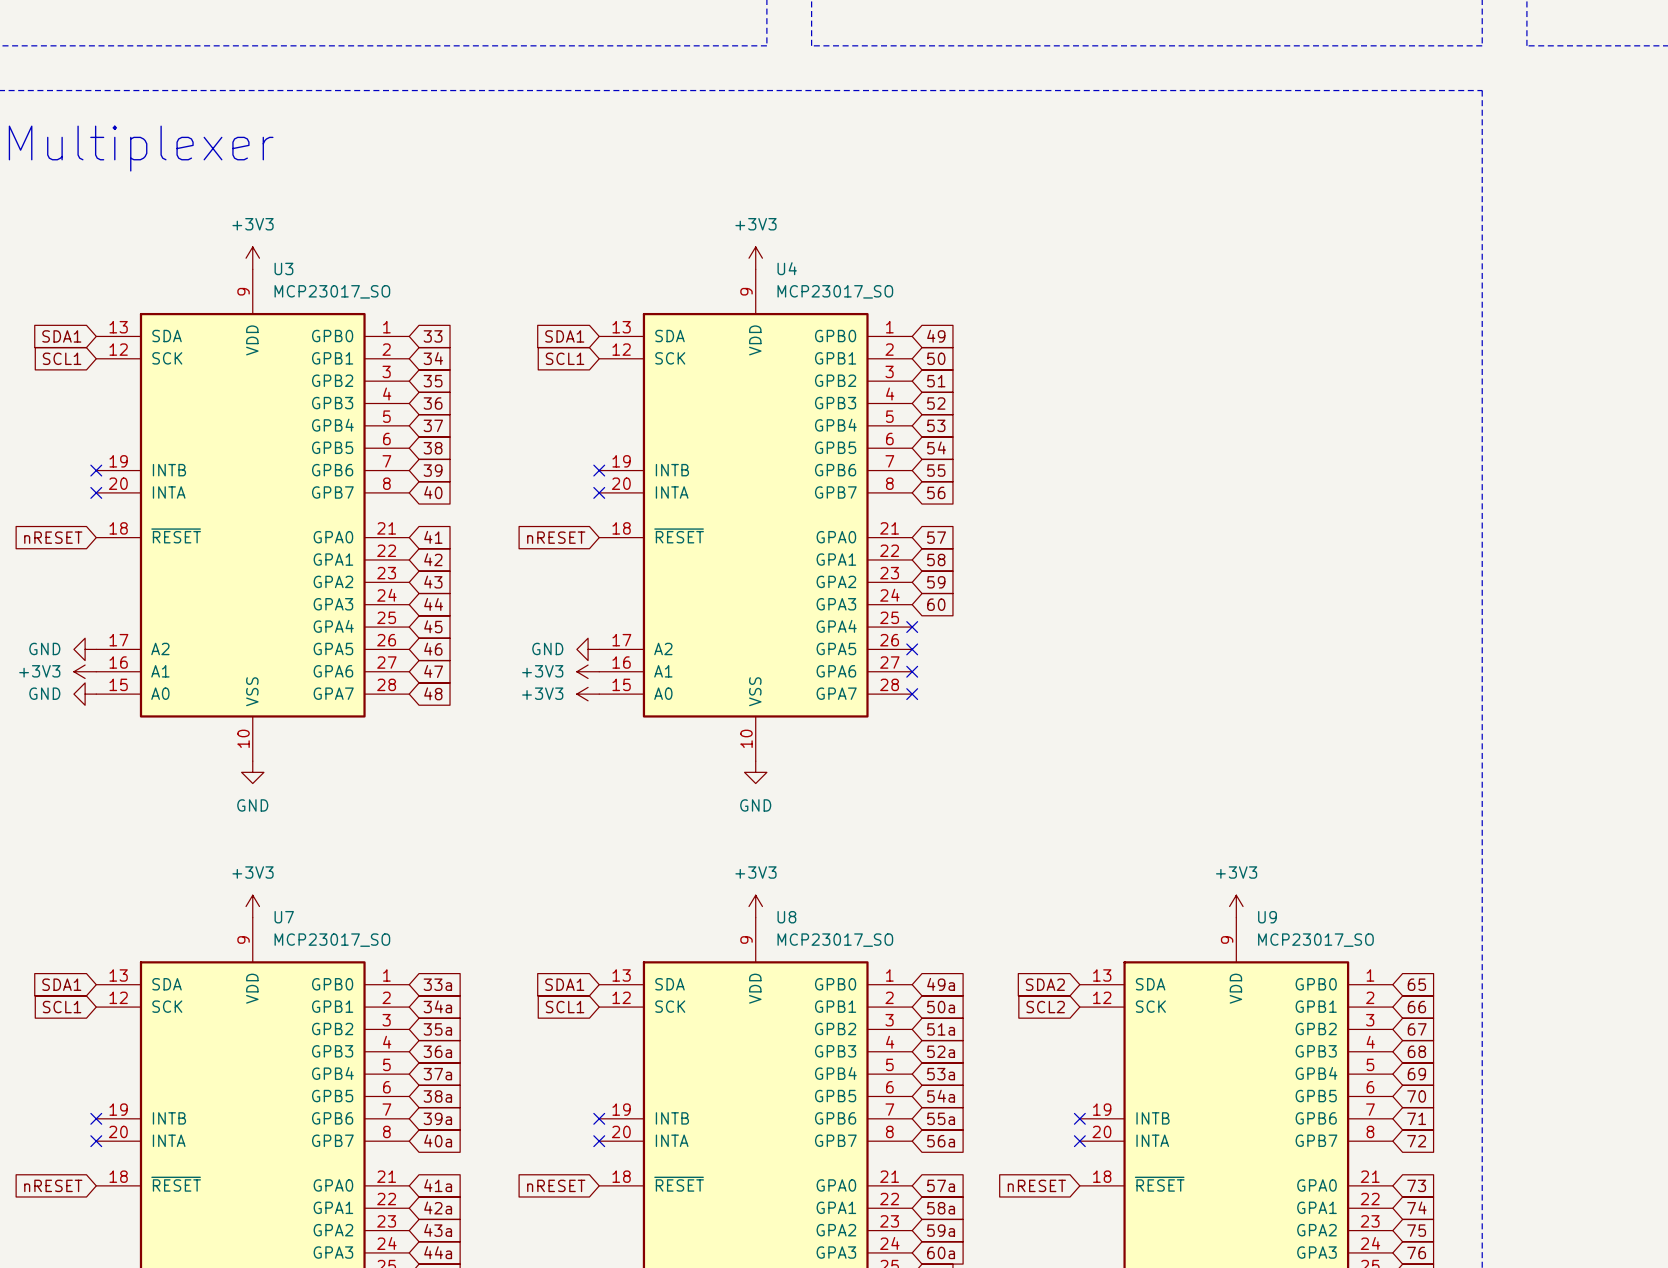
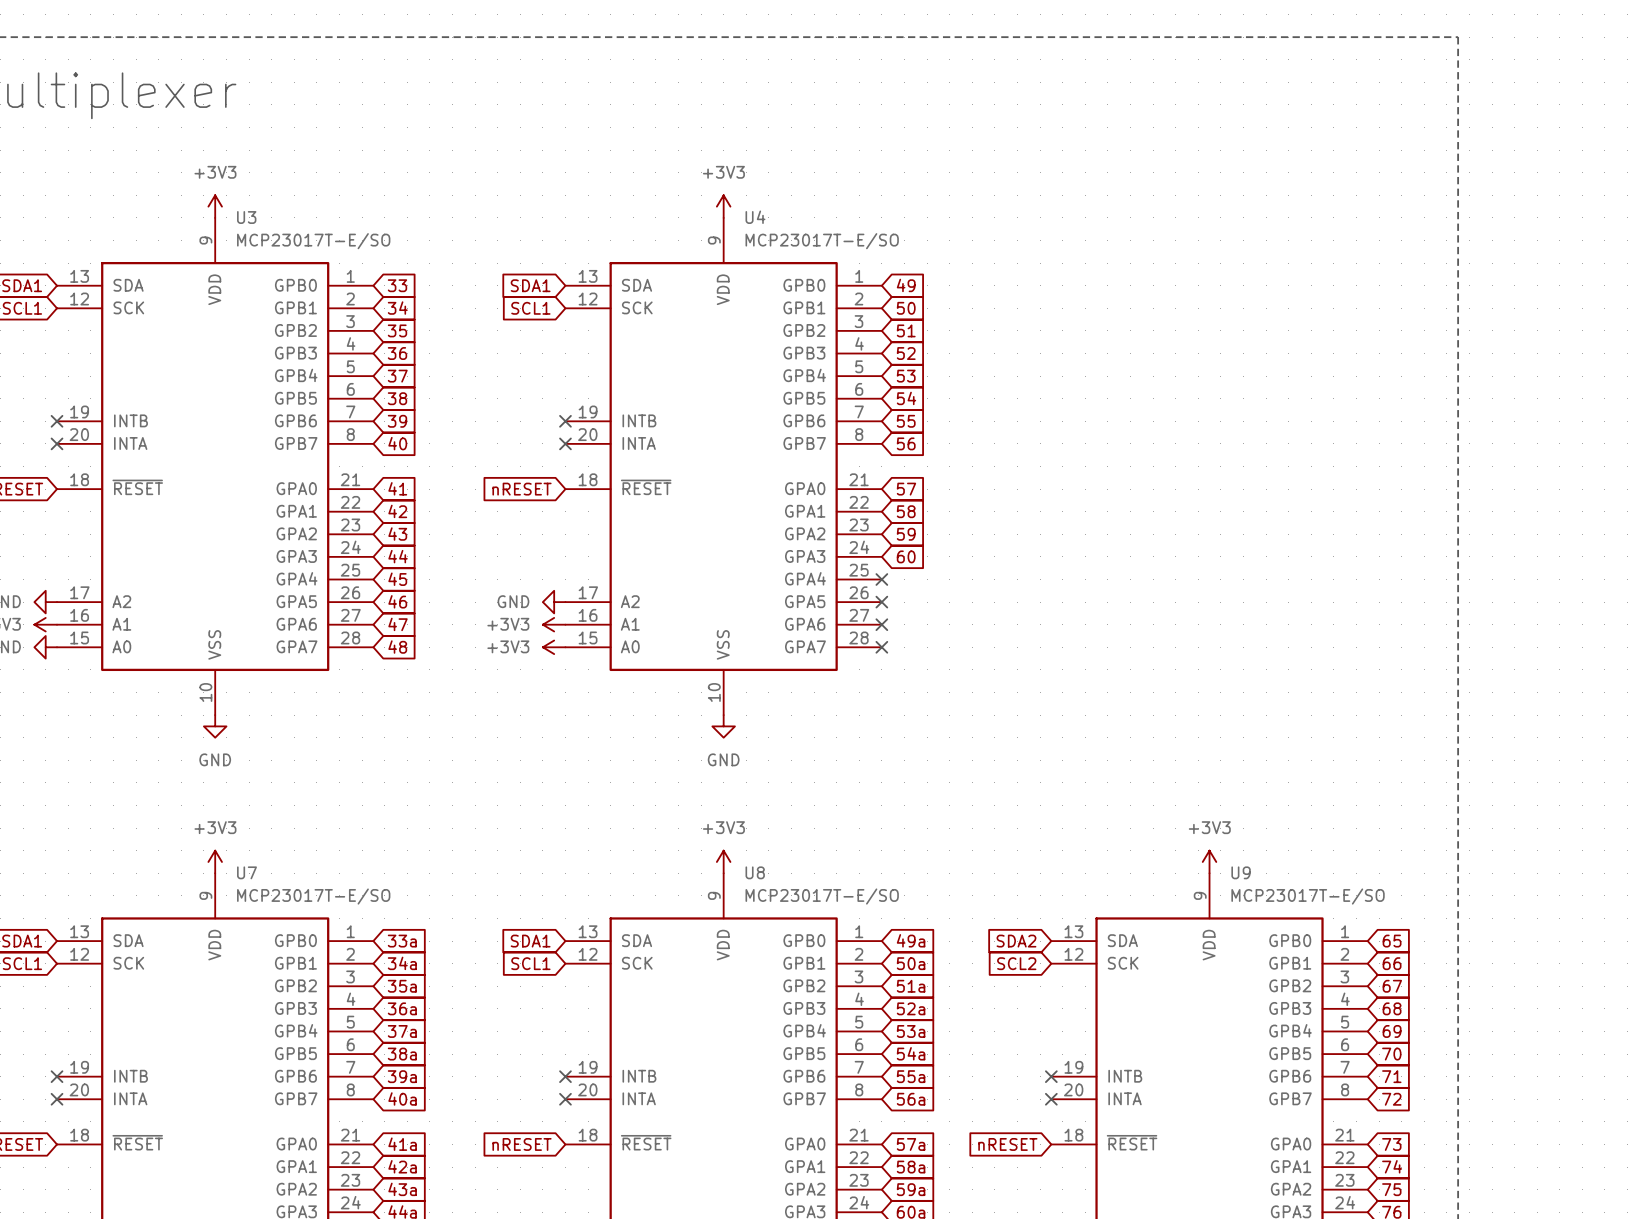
U3 value: MCP23017_SO (332, 291) -> MCP23017T-E/SO (313, 241)
U4 value: MCP23017_SO (835, 291) -> MCP23017T-E/SO (822, 241)
U7 value: MCP23017_SO (332, 940) -> MCP23017T-E/SO (313, 896)
U8 value: MCP23017_SO (835, 940) -> MCP23017T-E/SO (822, 896)
U9 value: MCP23017_SO (1315, 940) -> MCP23017T-E/SO (1308, 896)

